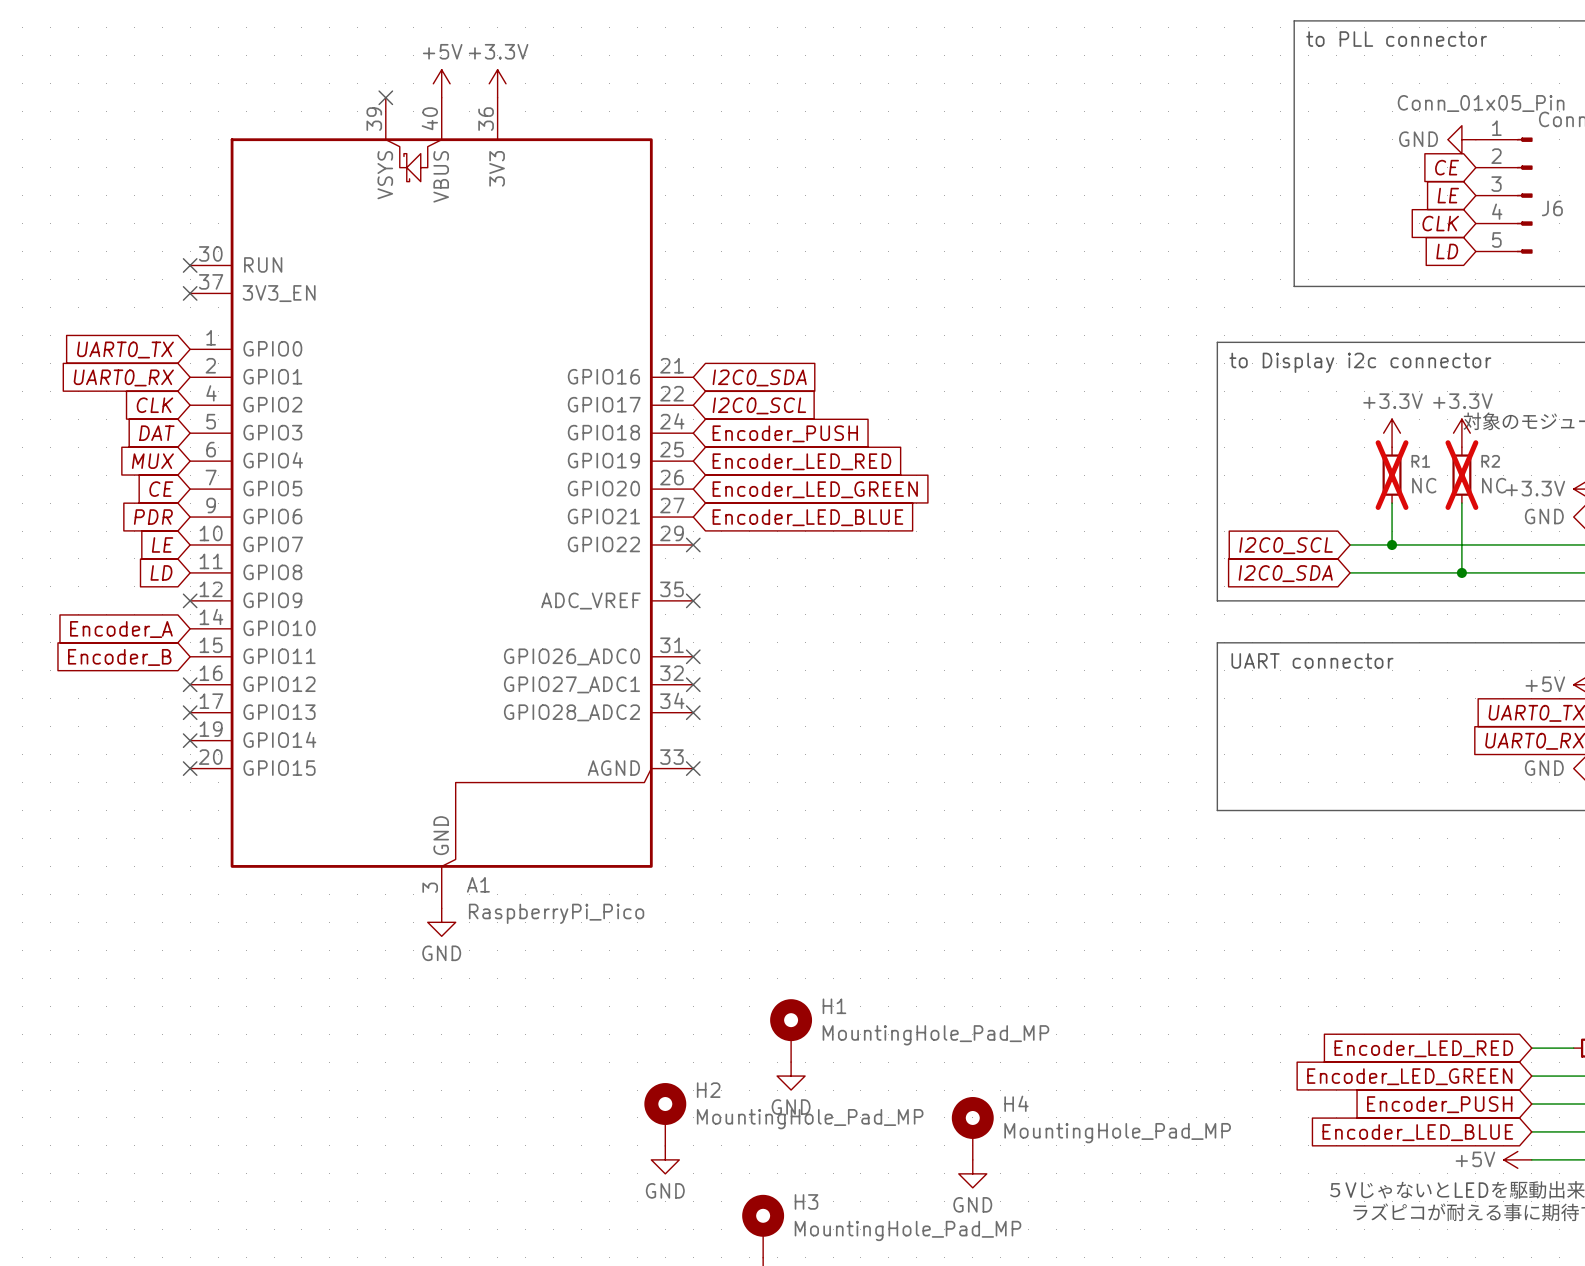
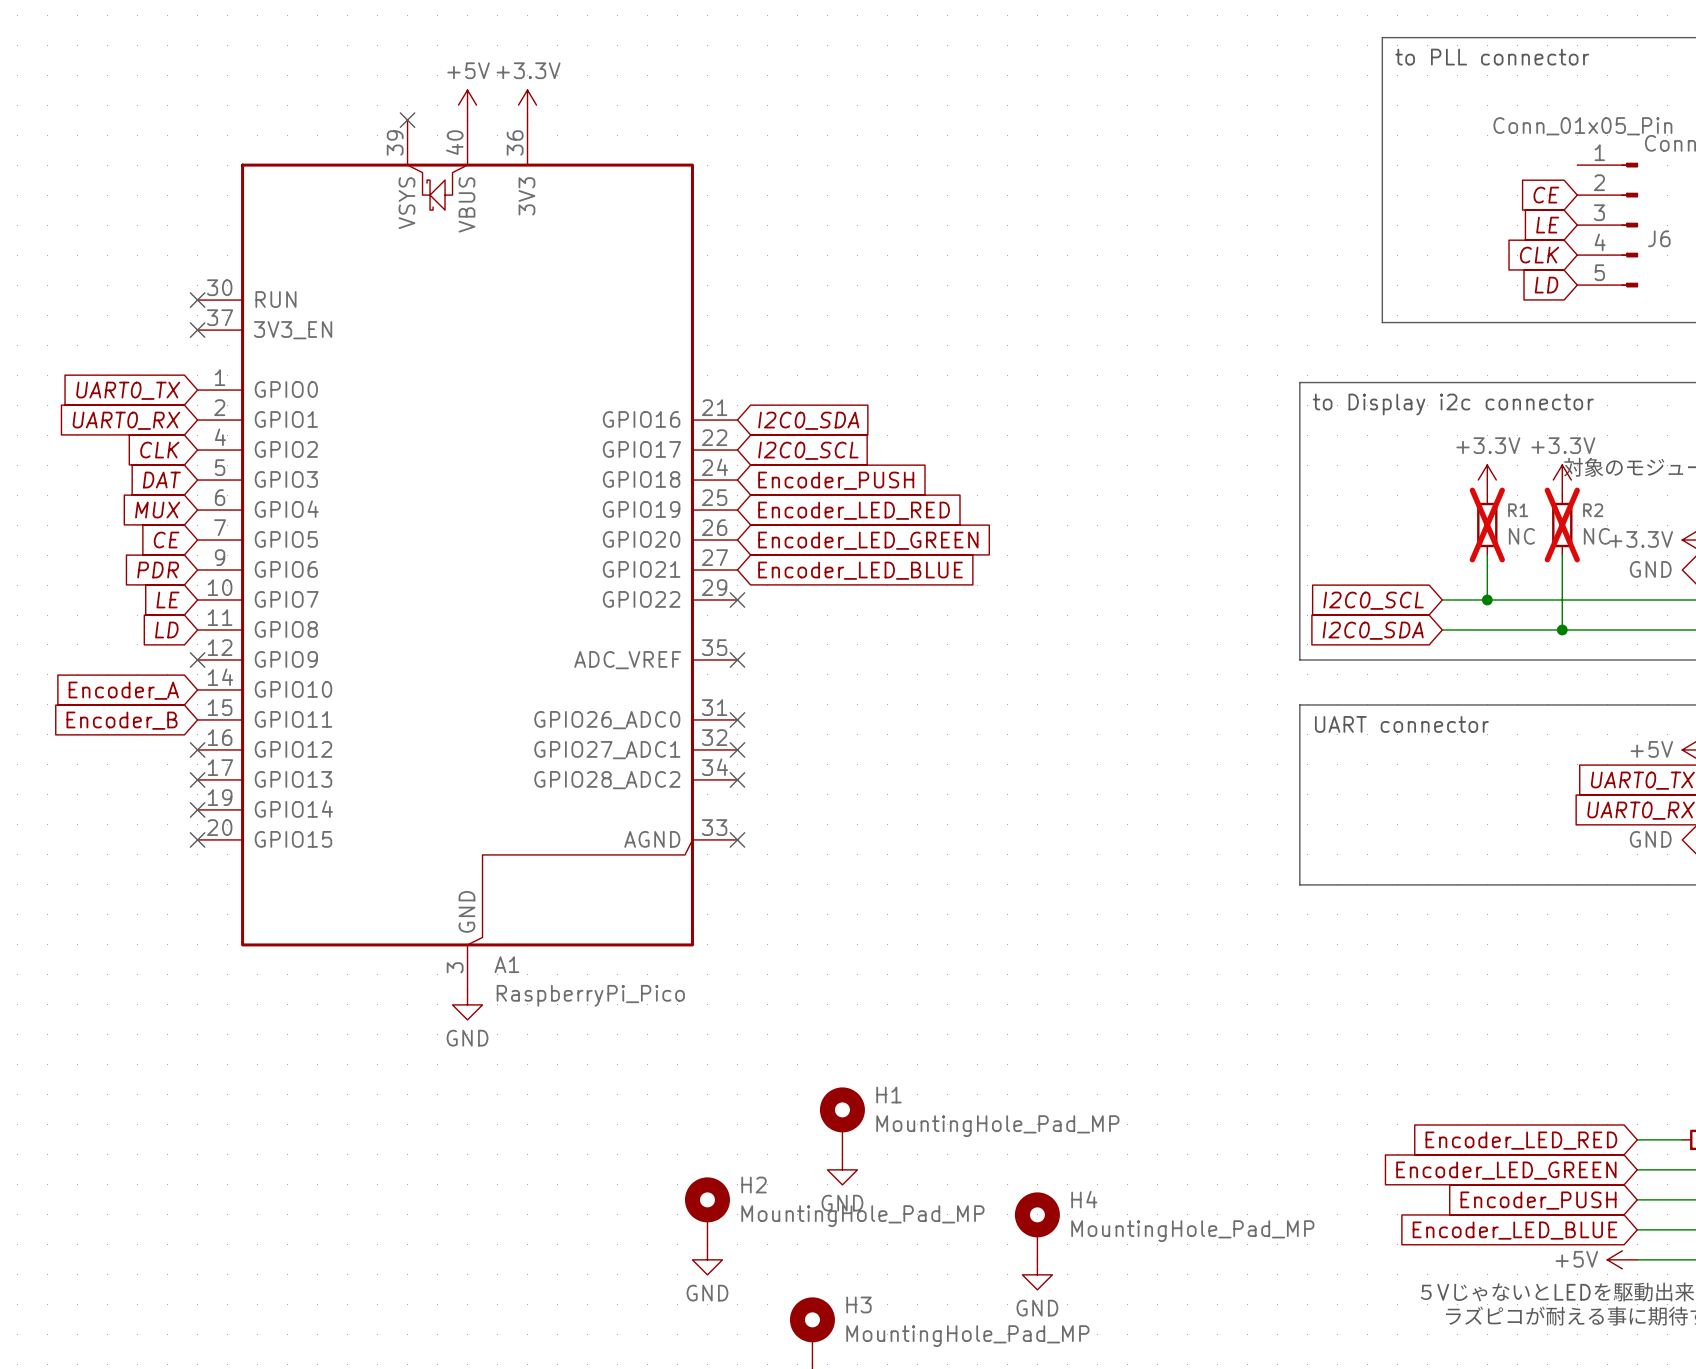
power symbol: GND (1461, 139) -> none

